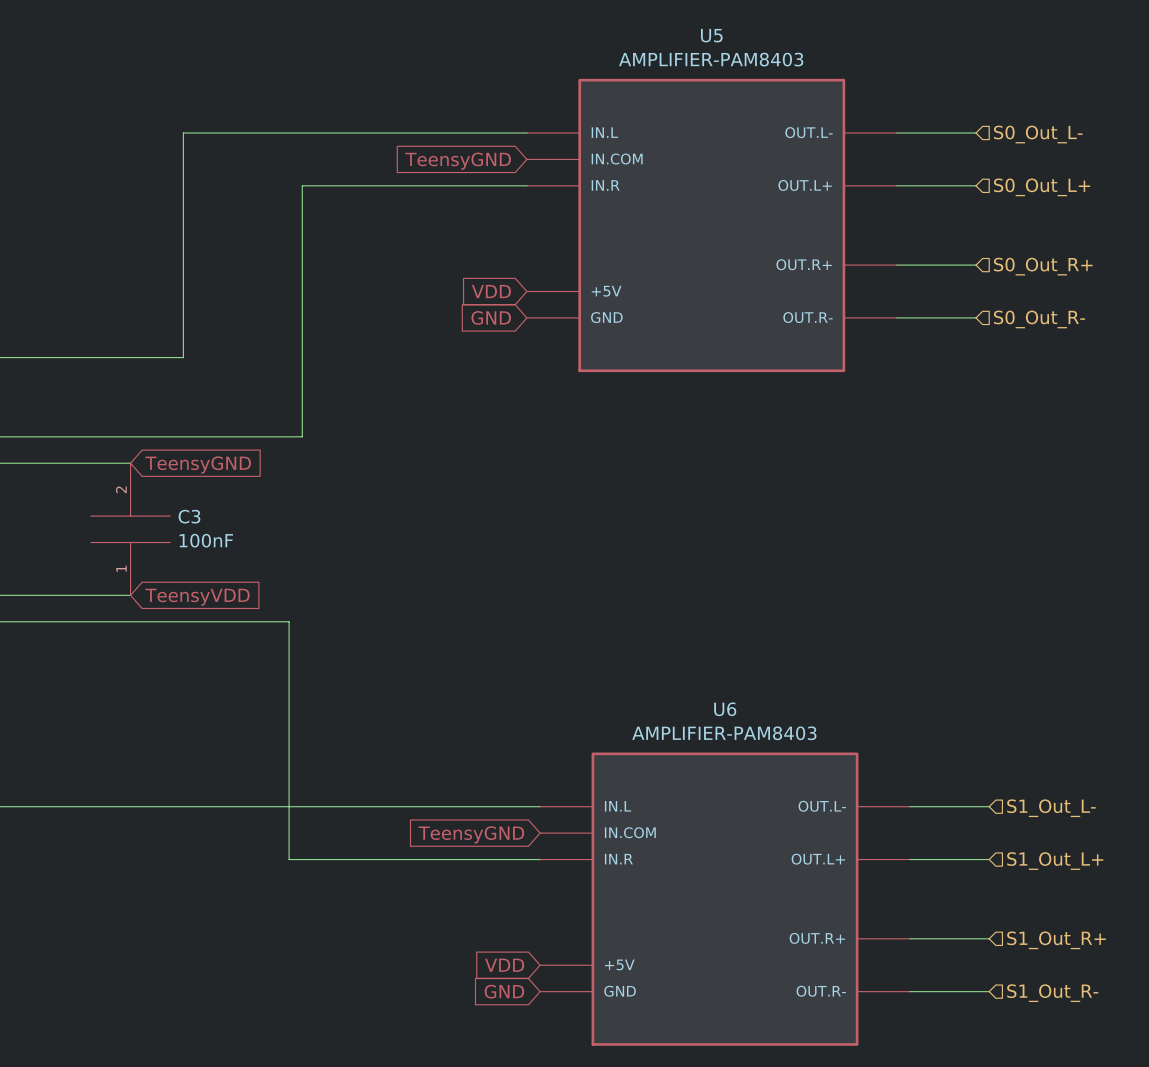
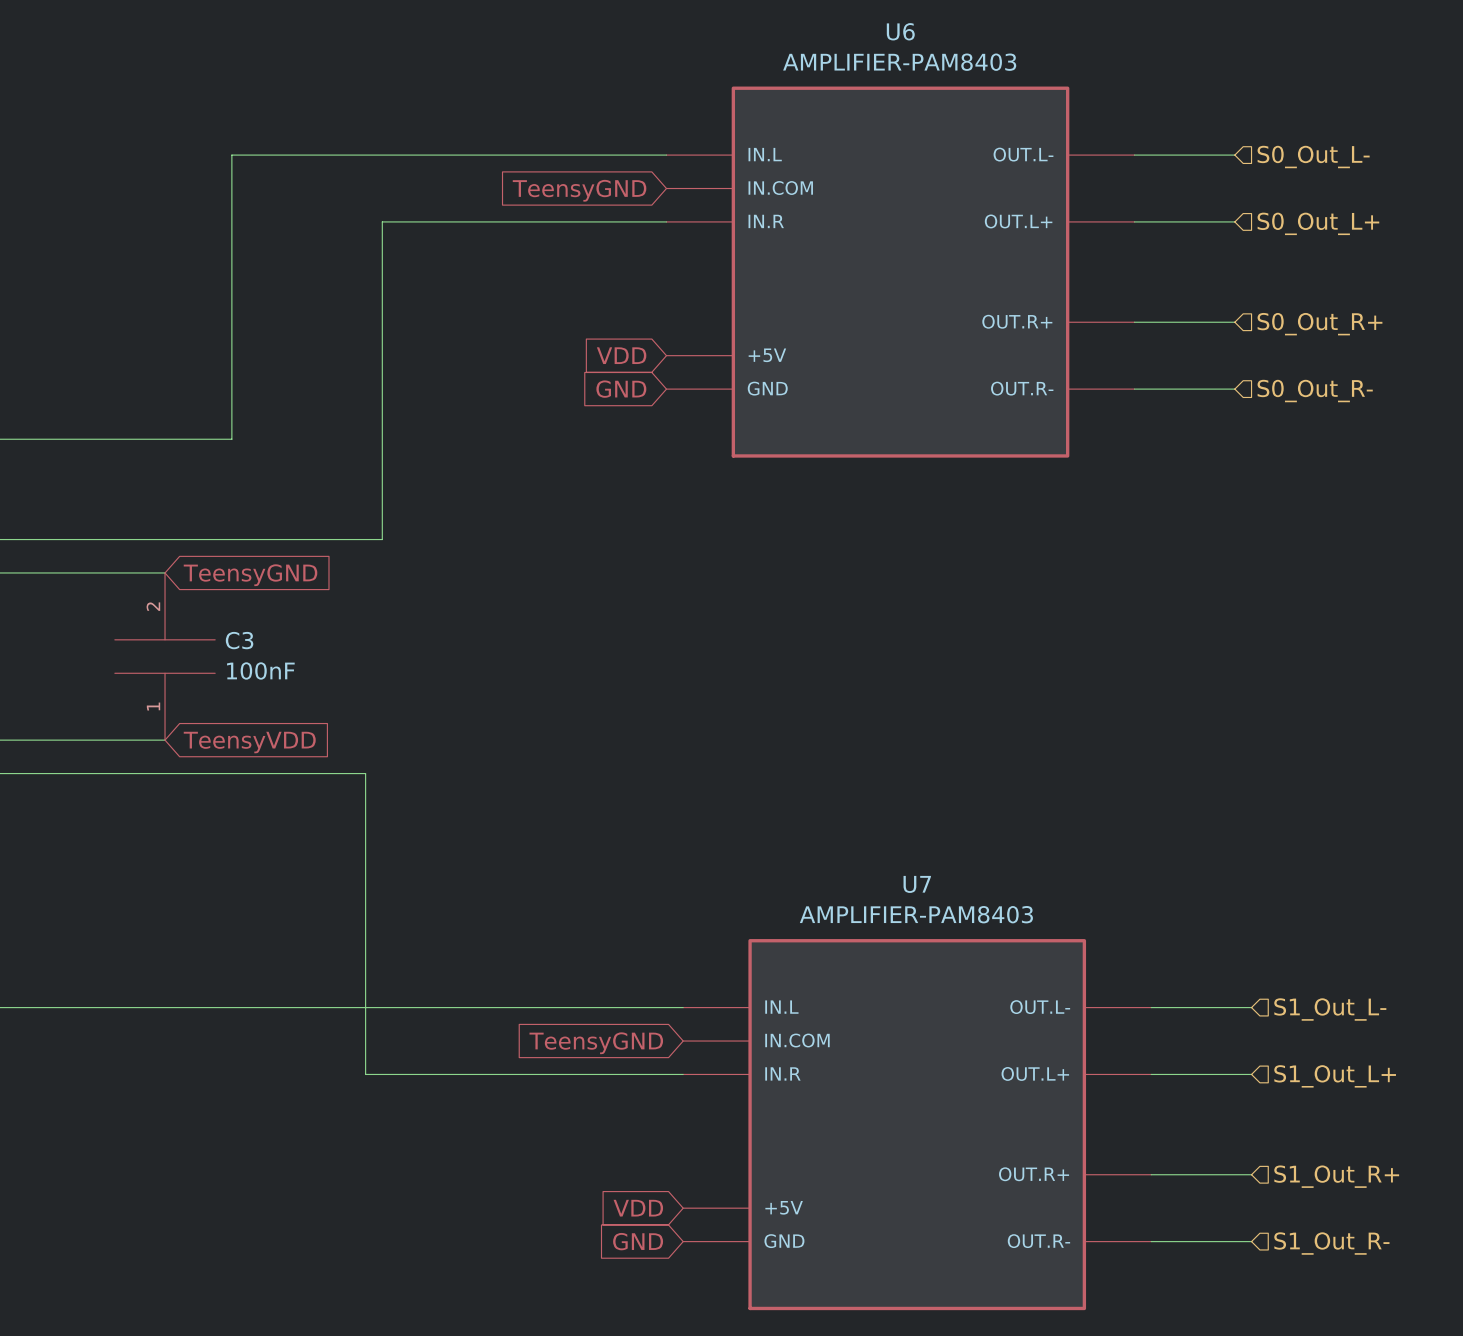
U5 name: U5 (711, 35) -> U6 (900, 31)
U6 name: U6 (725, 709) -> U7 (917, 884)

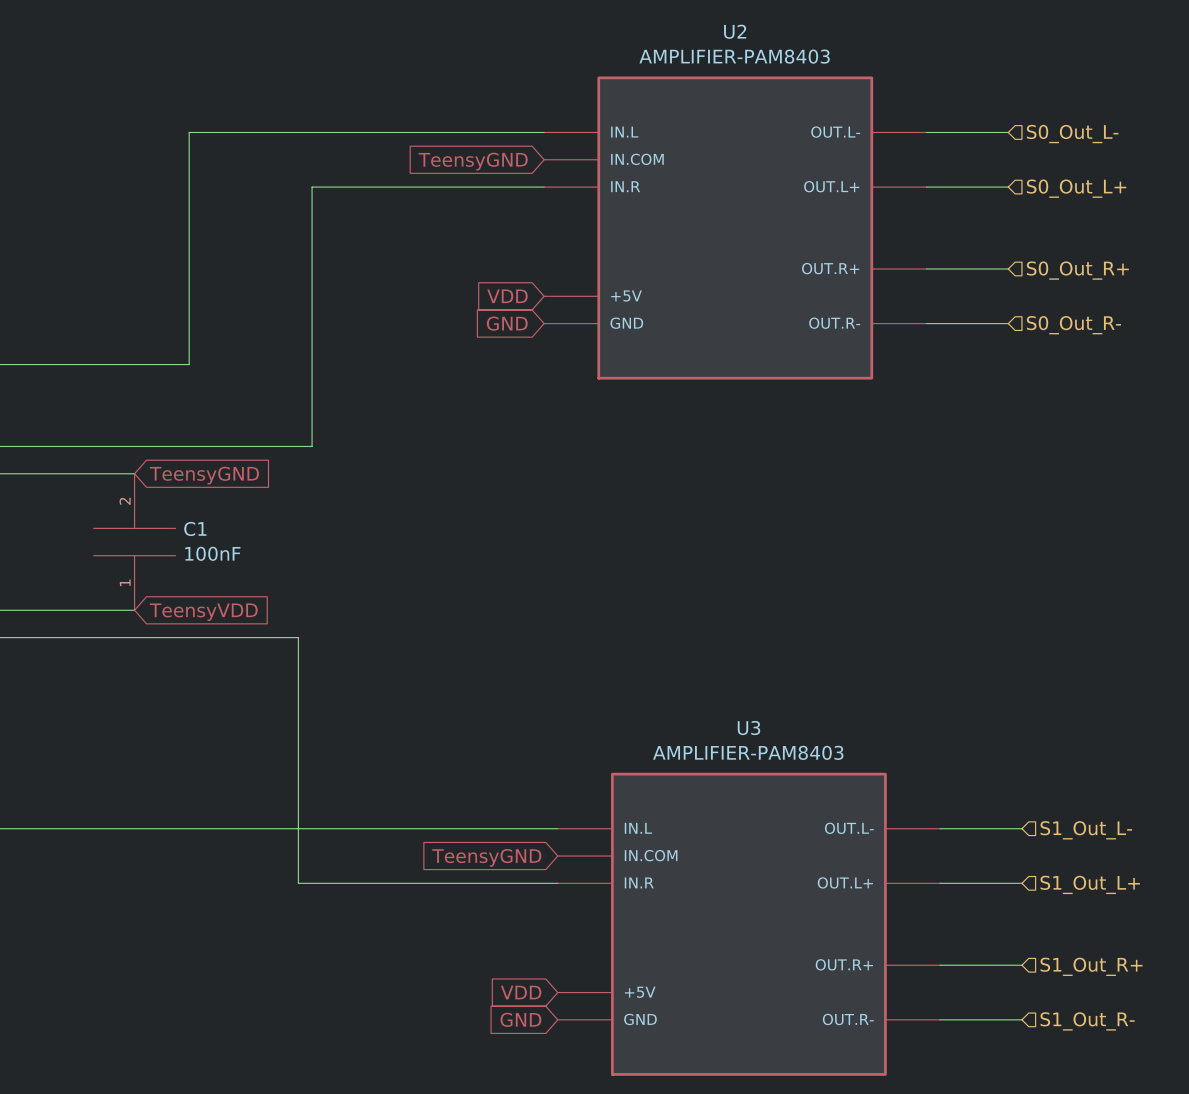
U6 name: U6 (900, 31) -> U2 (735, 31)
C3 name: C3 (239, 640) -> C1 (195, 528)
U7 name: U7 (917, 884) -> U3 (748, 728)

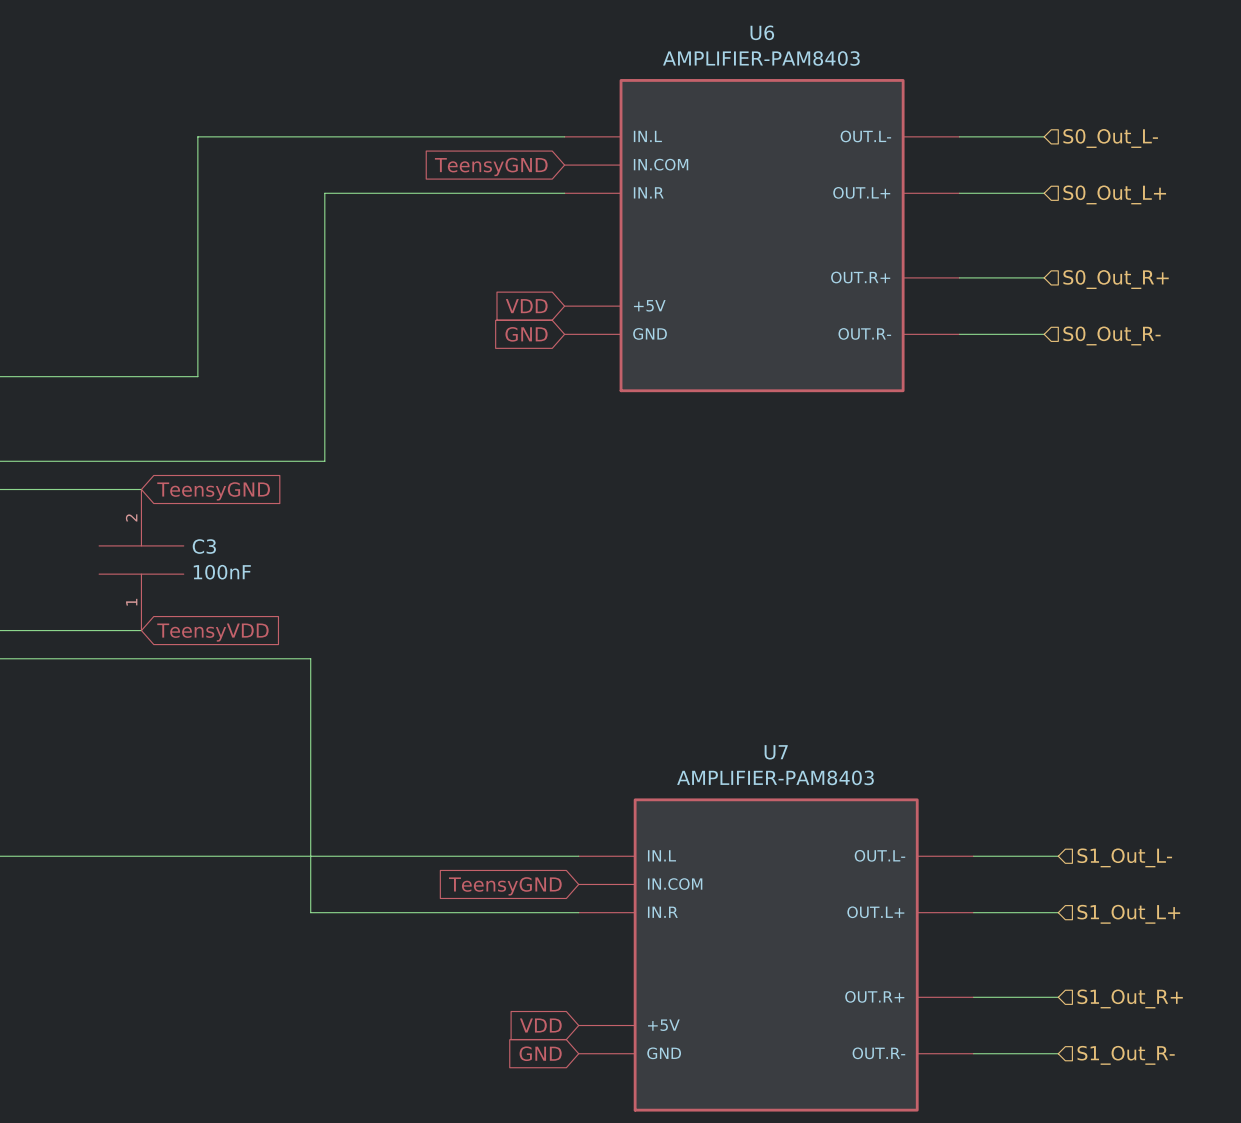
U2 name: U2 (735, 31) -> U6 (762, 32)
C1 name: C1 (195, 528) -> C3 (204, 546)
U3 name: U3 (748, 728) -> U7 (776, 752)

